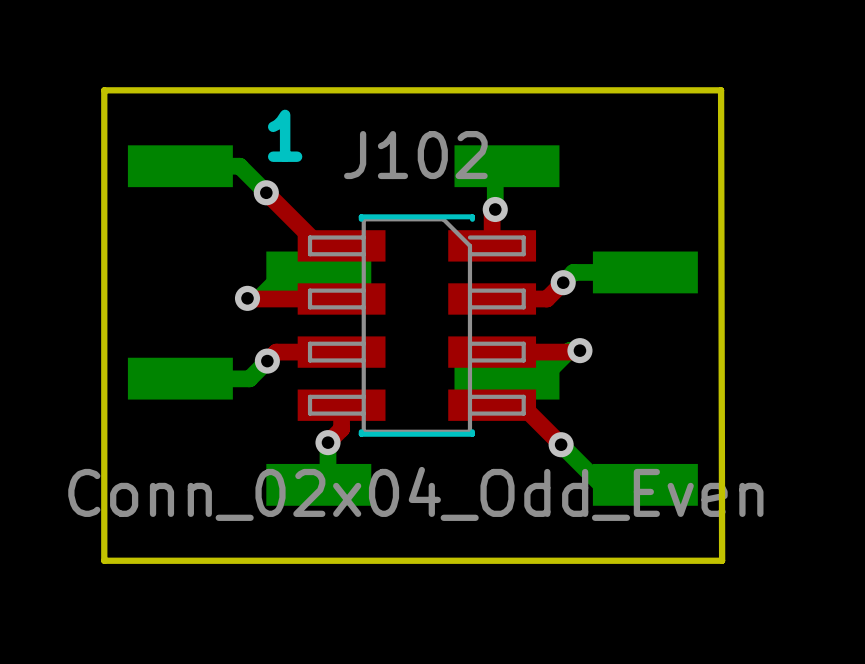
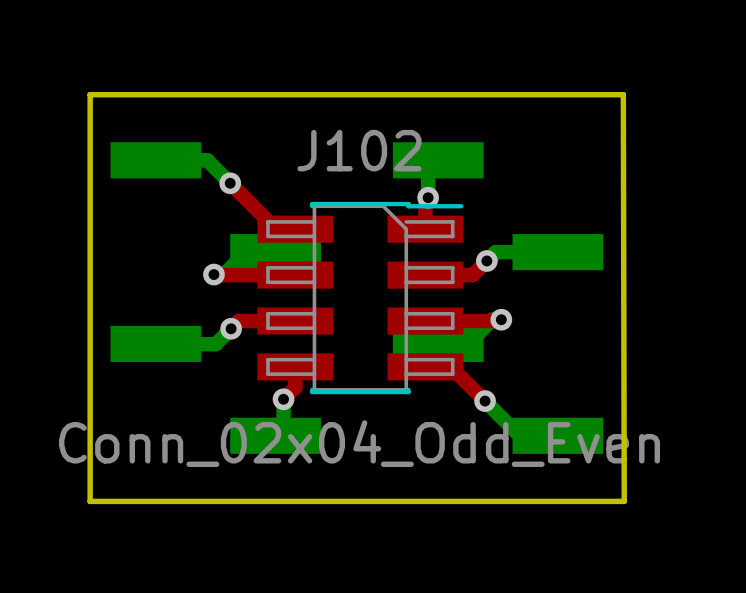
text: 1 (285, 135) -> none
J102 footprint: [297, 214, 537, 437] -> [257, 201, 464, 395]

